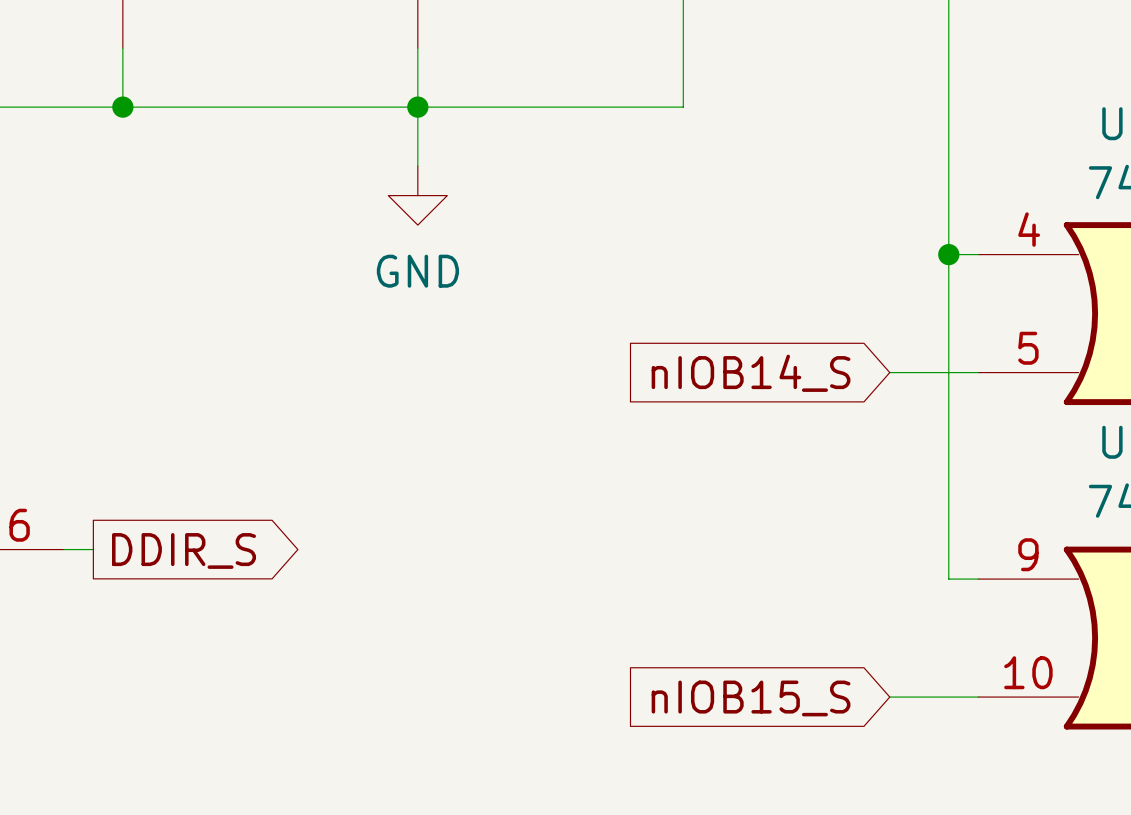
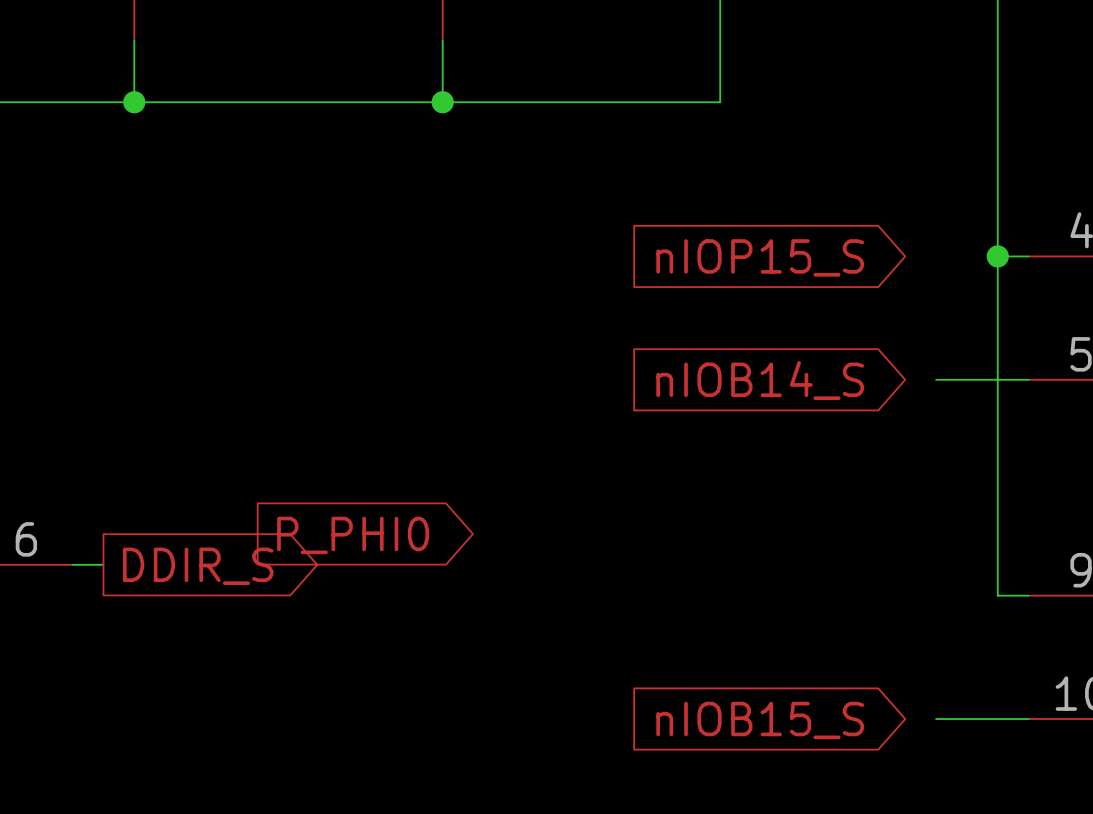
wire: (417, 107) (417, 166) -> none
power symbol: GND (417, 195) -> none
global label: none -> nIOP15_S (760, 257)
global label position: nIOB14_S (751, 373) -> nIOB14_S (760, 380)
global label: none -> P_PHI0 (353, 535)
global label position: nIOB15_S (751, 698) -> nIOB15_S (760, 720)

